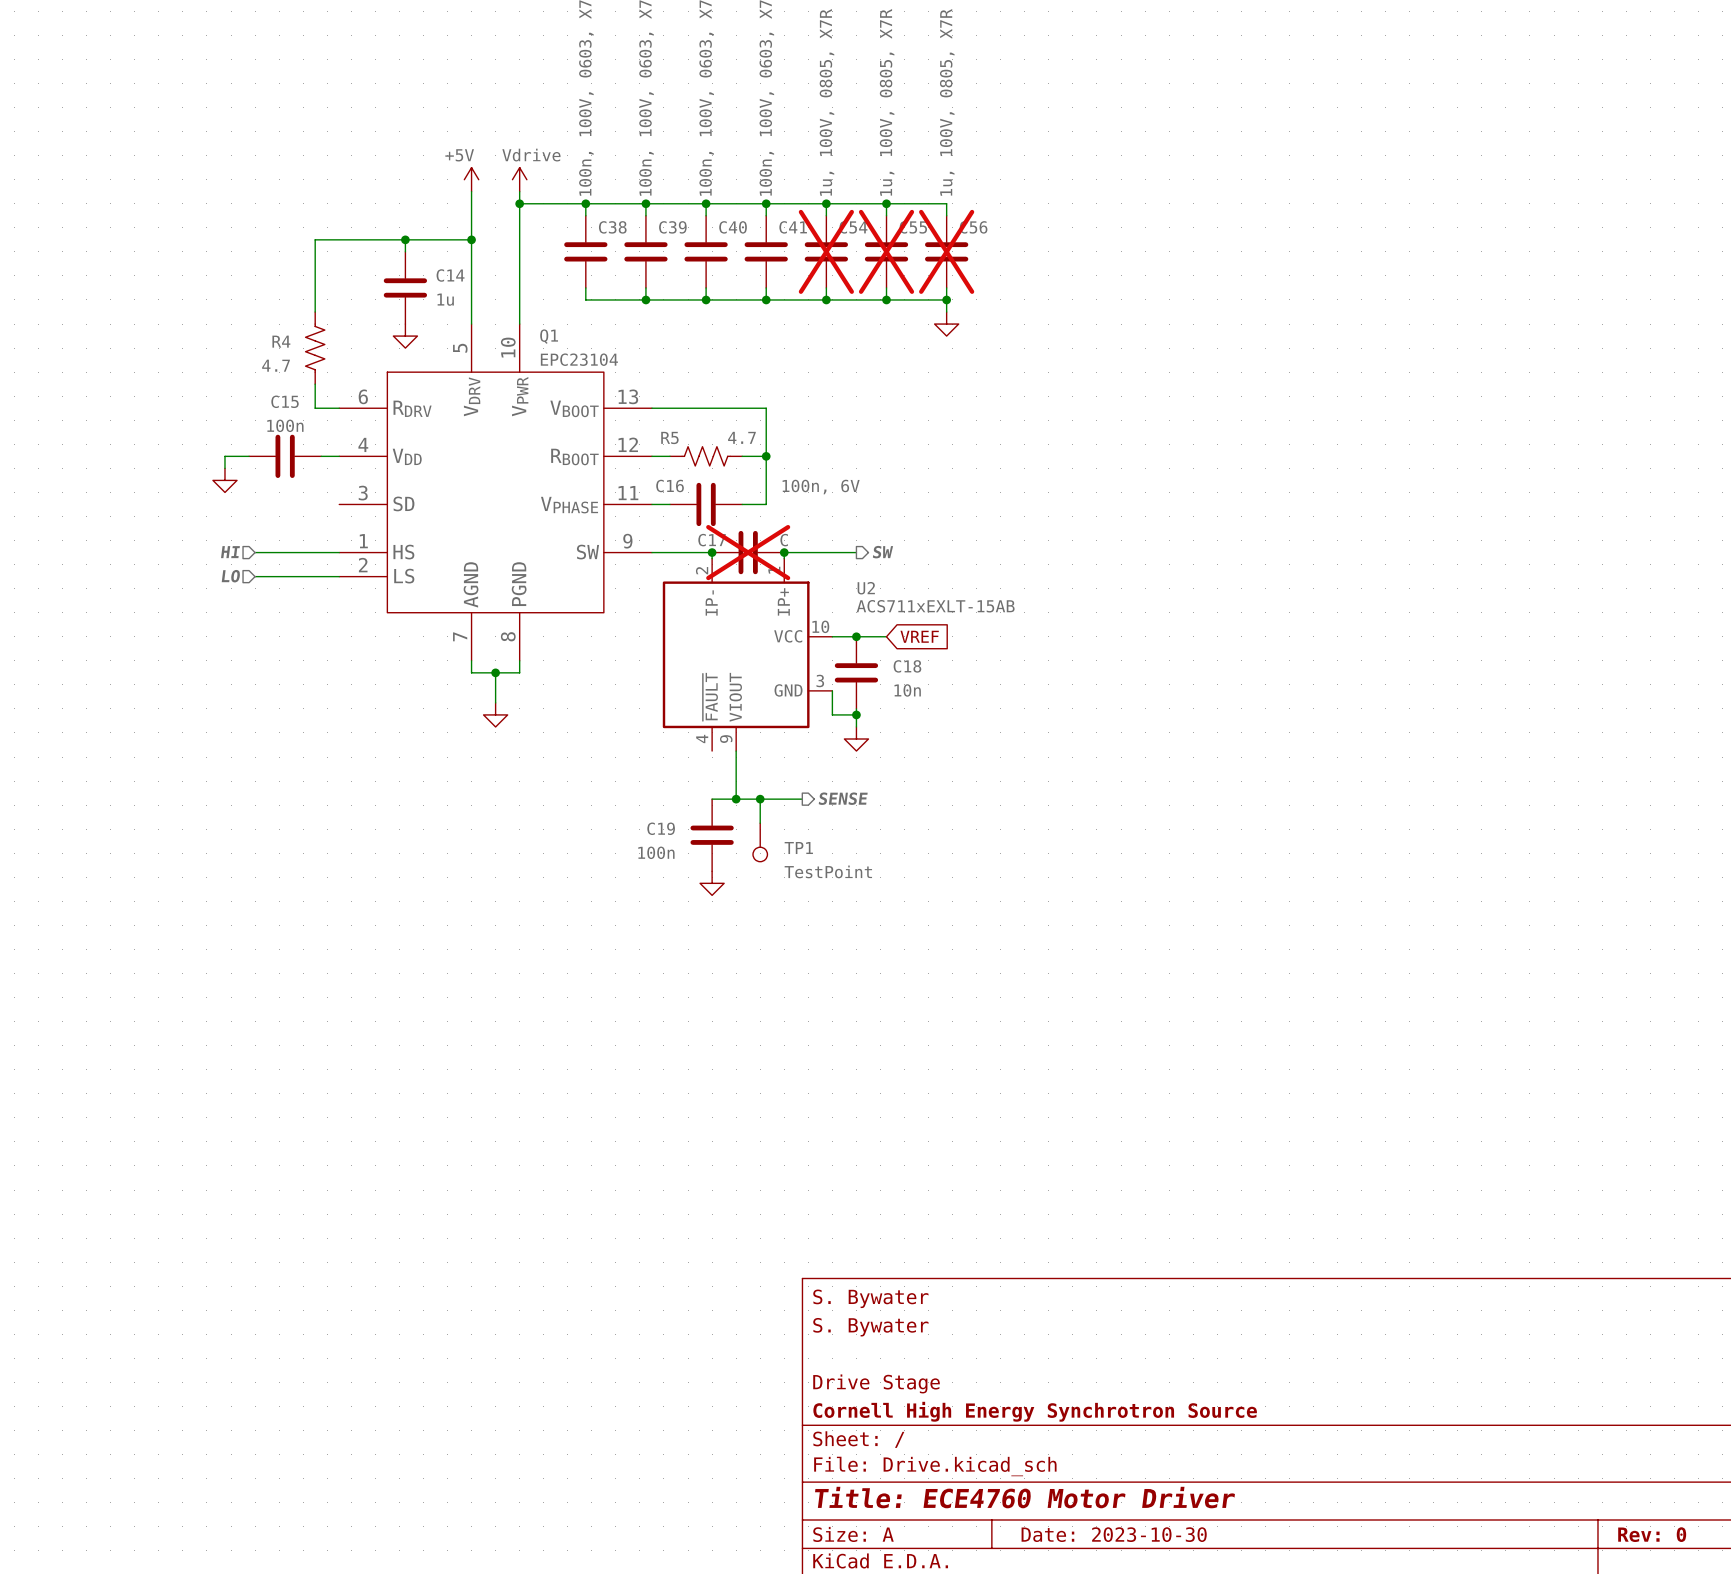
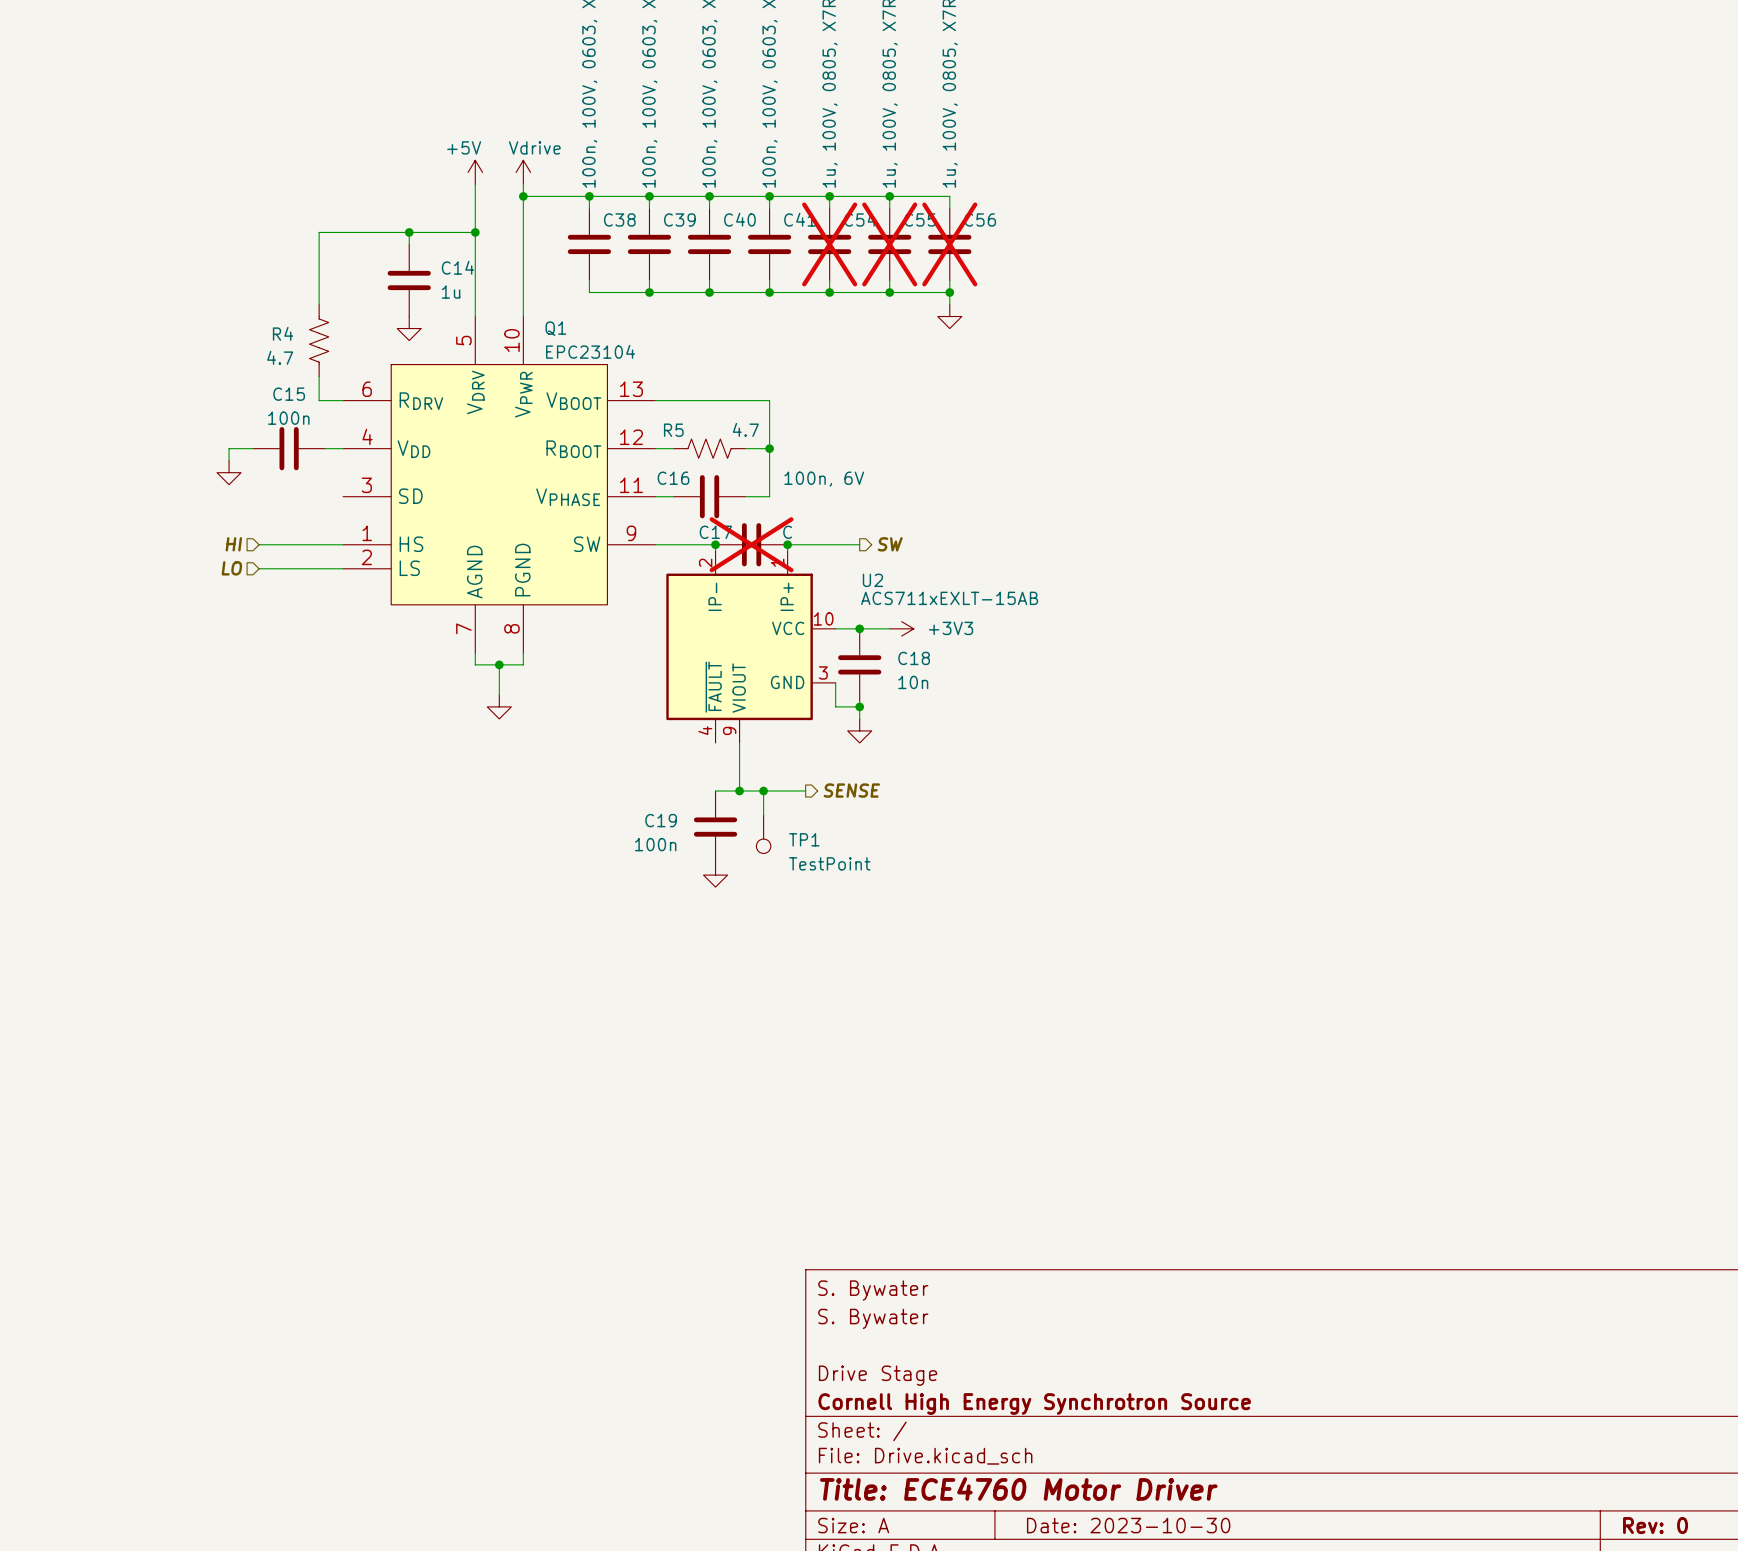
power symbol: none -> +3V3 (901, 628)
global label: VREF (919, 636) -> none

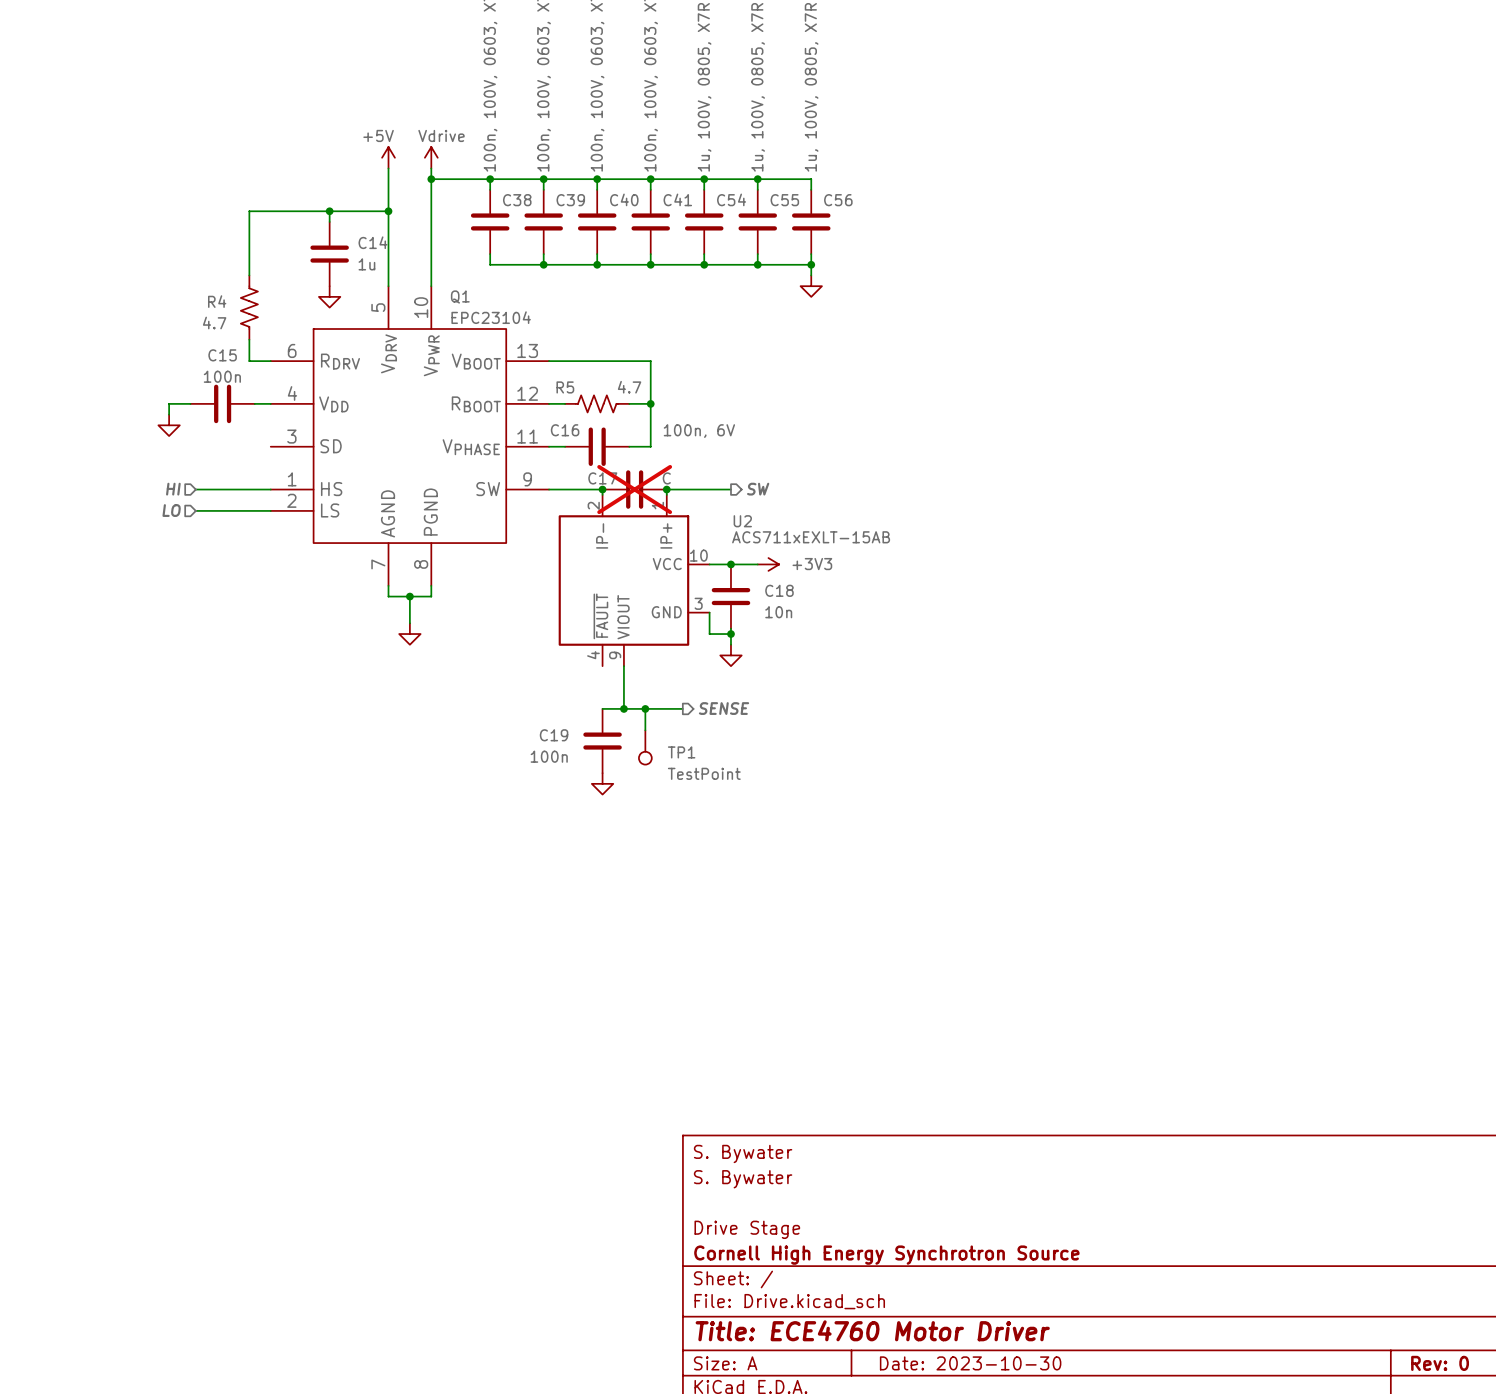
C54 do-not-place cross: (829, 244) -> none
C55 do-not-place cross: (889, 244) -> none
C56 do-not-place cross: (949, 244) -> none

